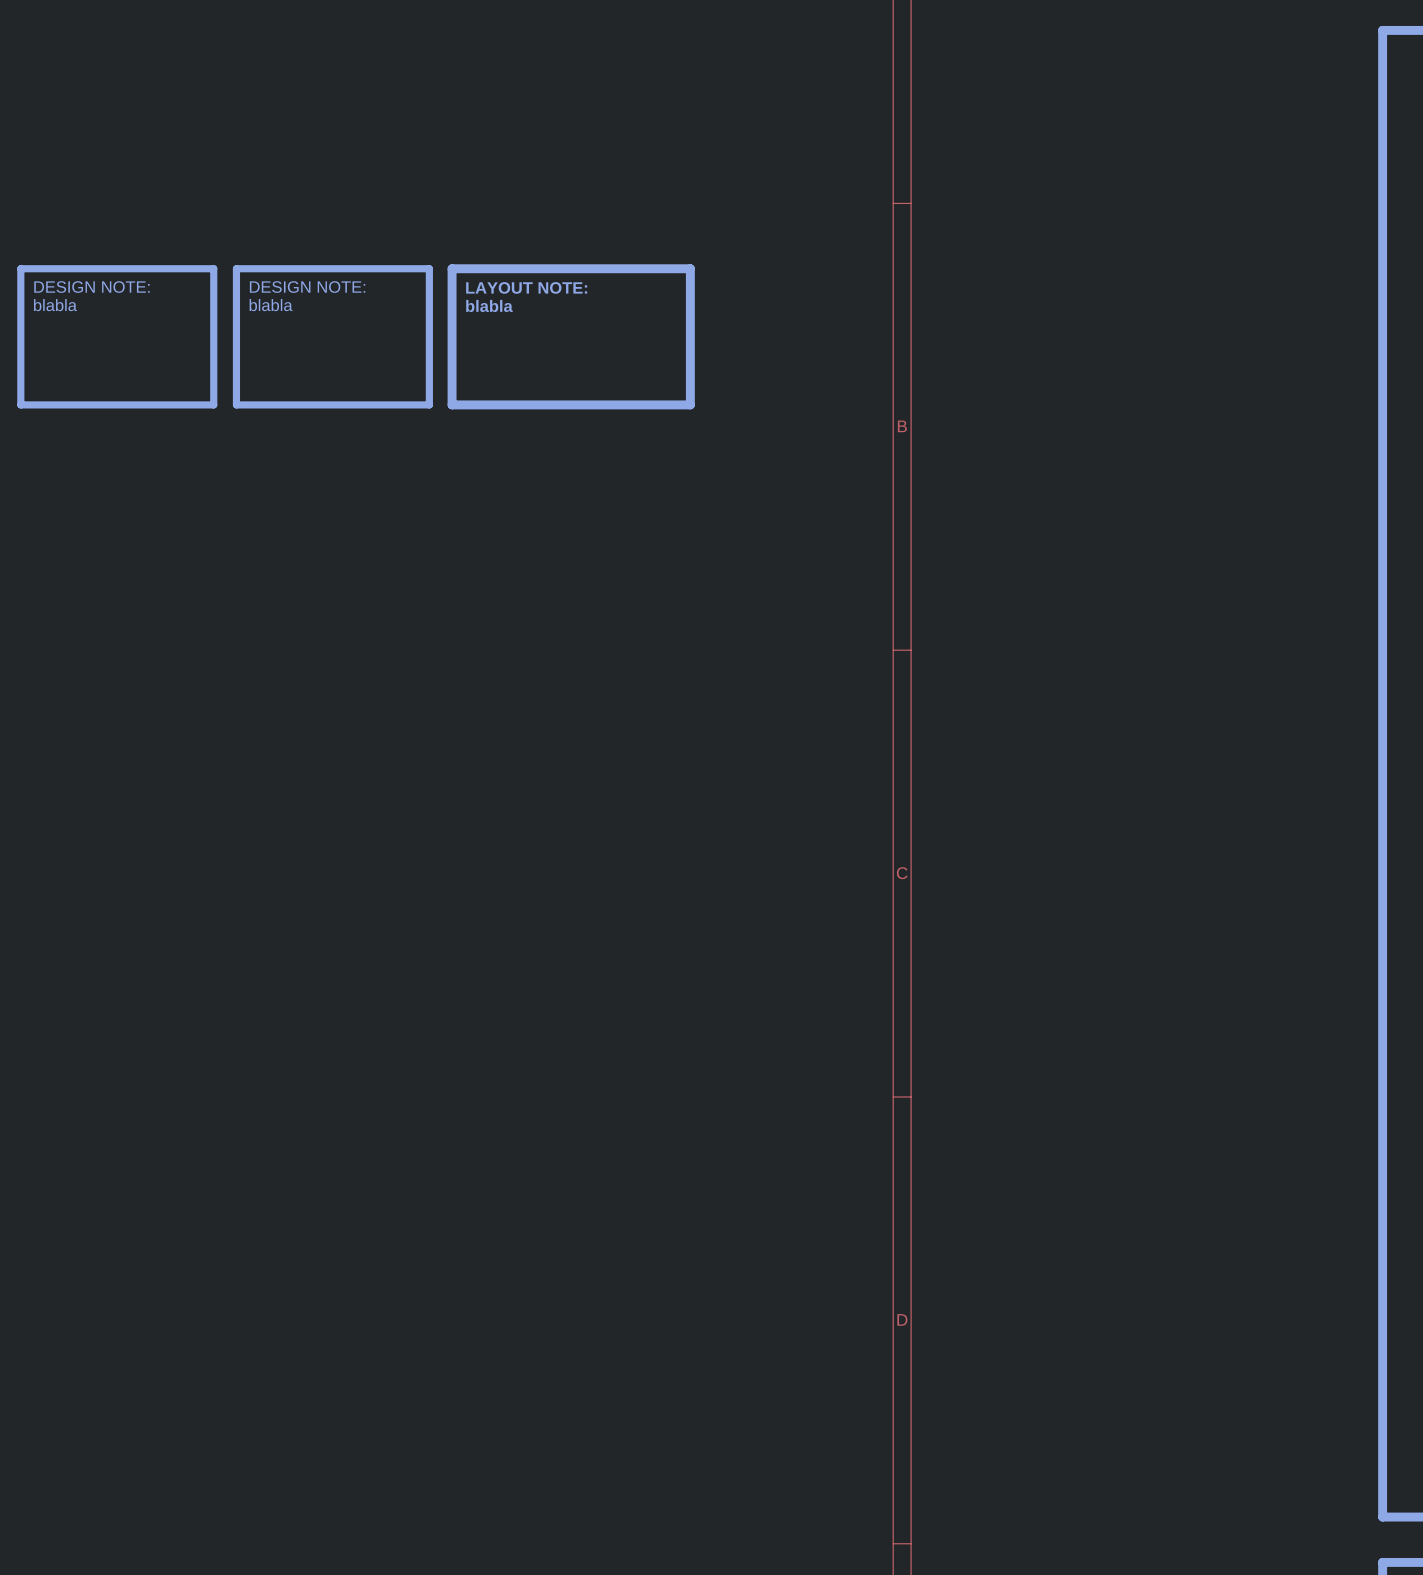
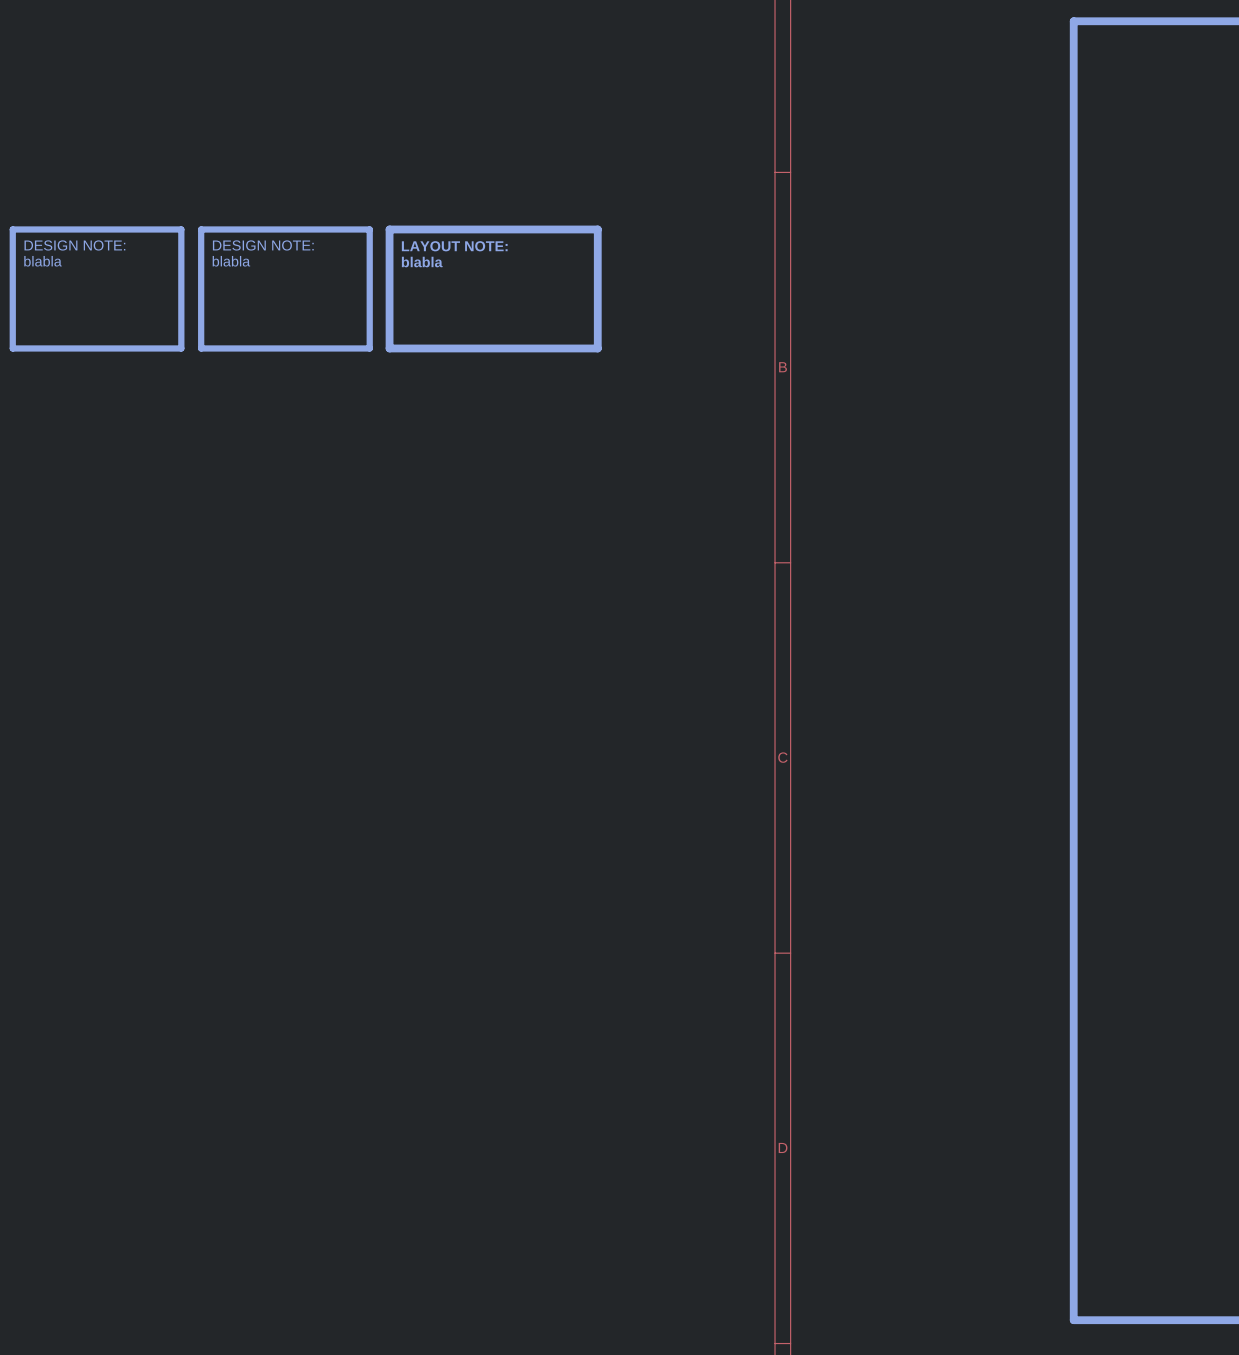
line: (1382, 30) (1382, 1517) -> (1202, 21) (1073, 21) (1073, 1320) (1202, 1320)

